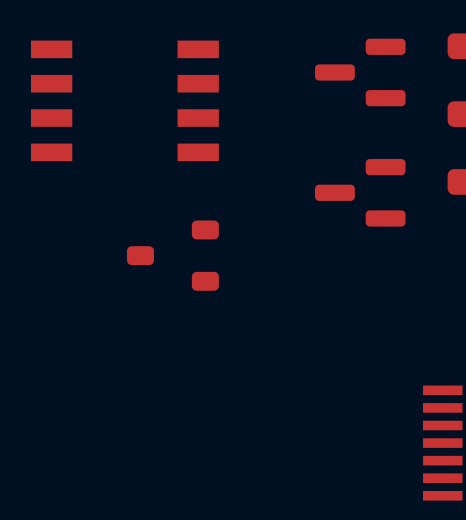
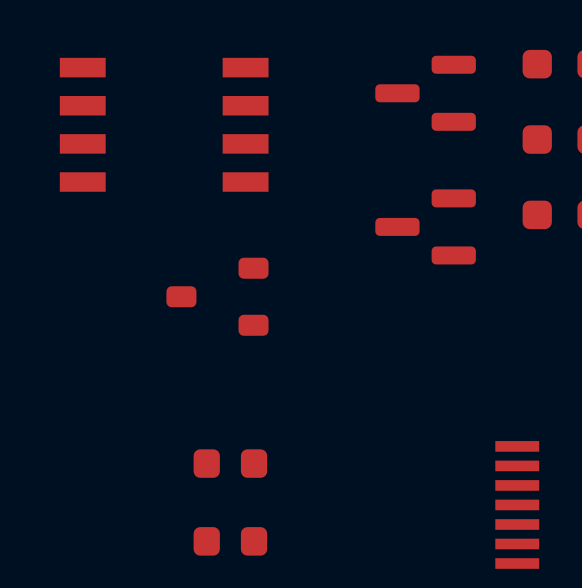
part: none -> (230, 463)
part: none -> (230, 541)

